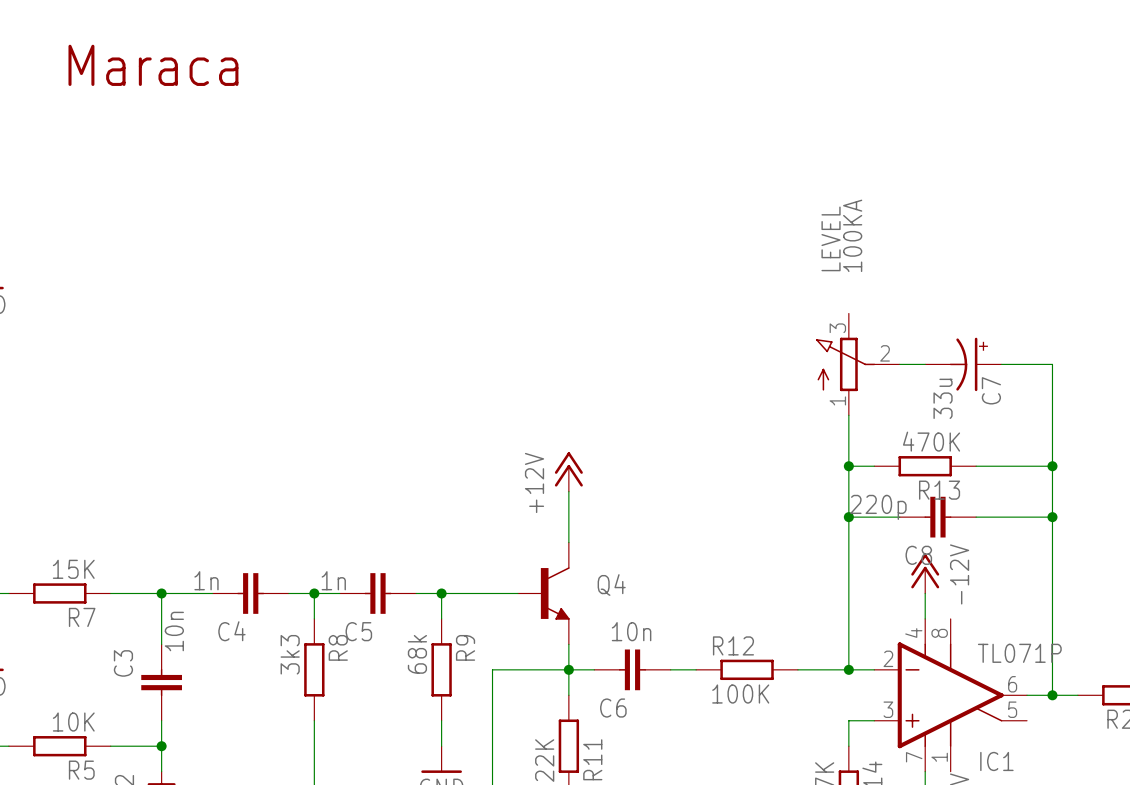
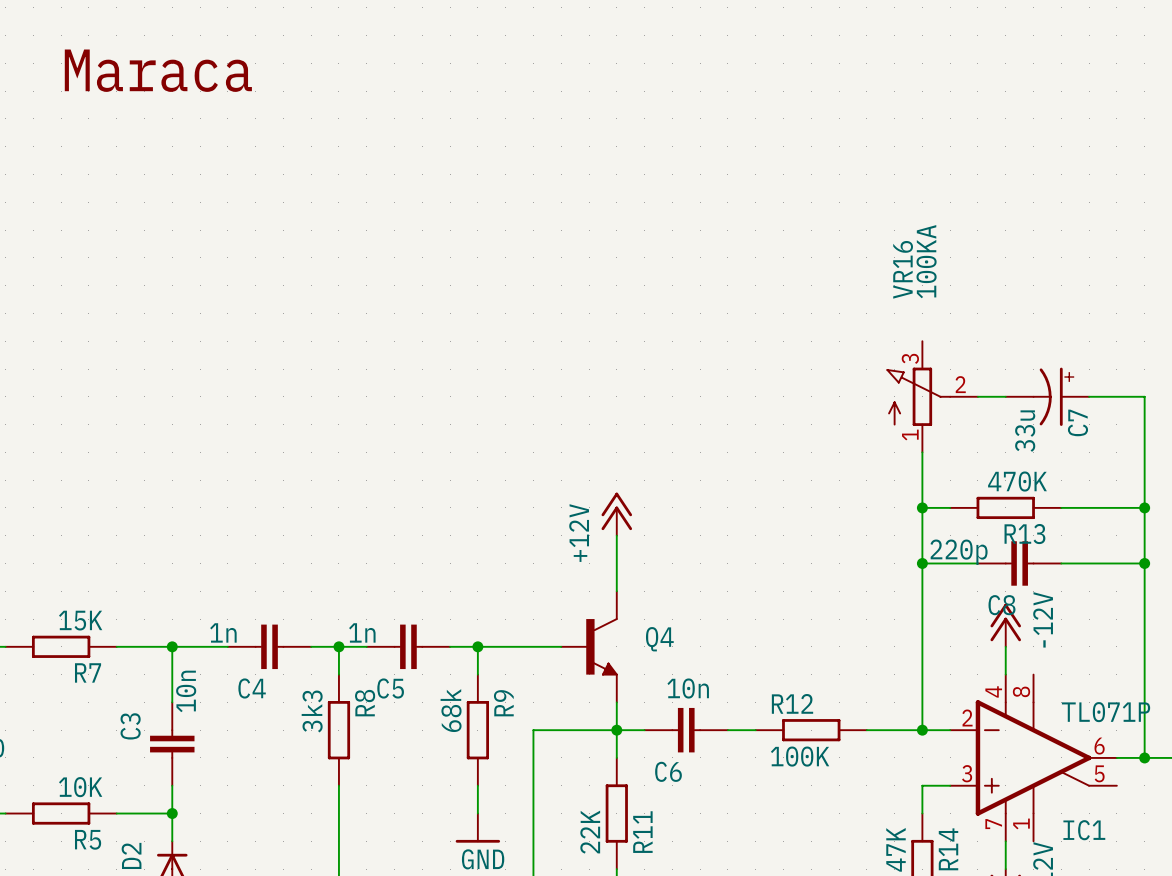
LEVEL name: LEVEL (831, 238) -> VR16 (903, 269)

